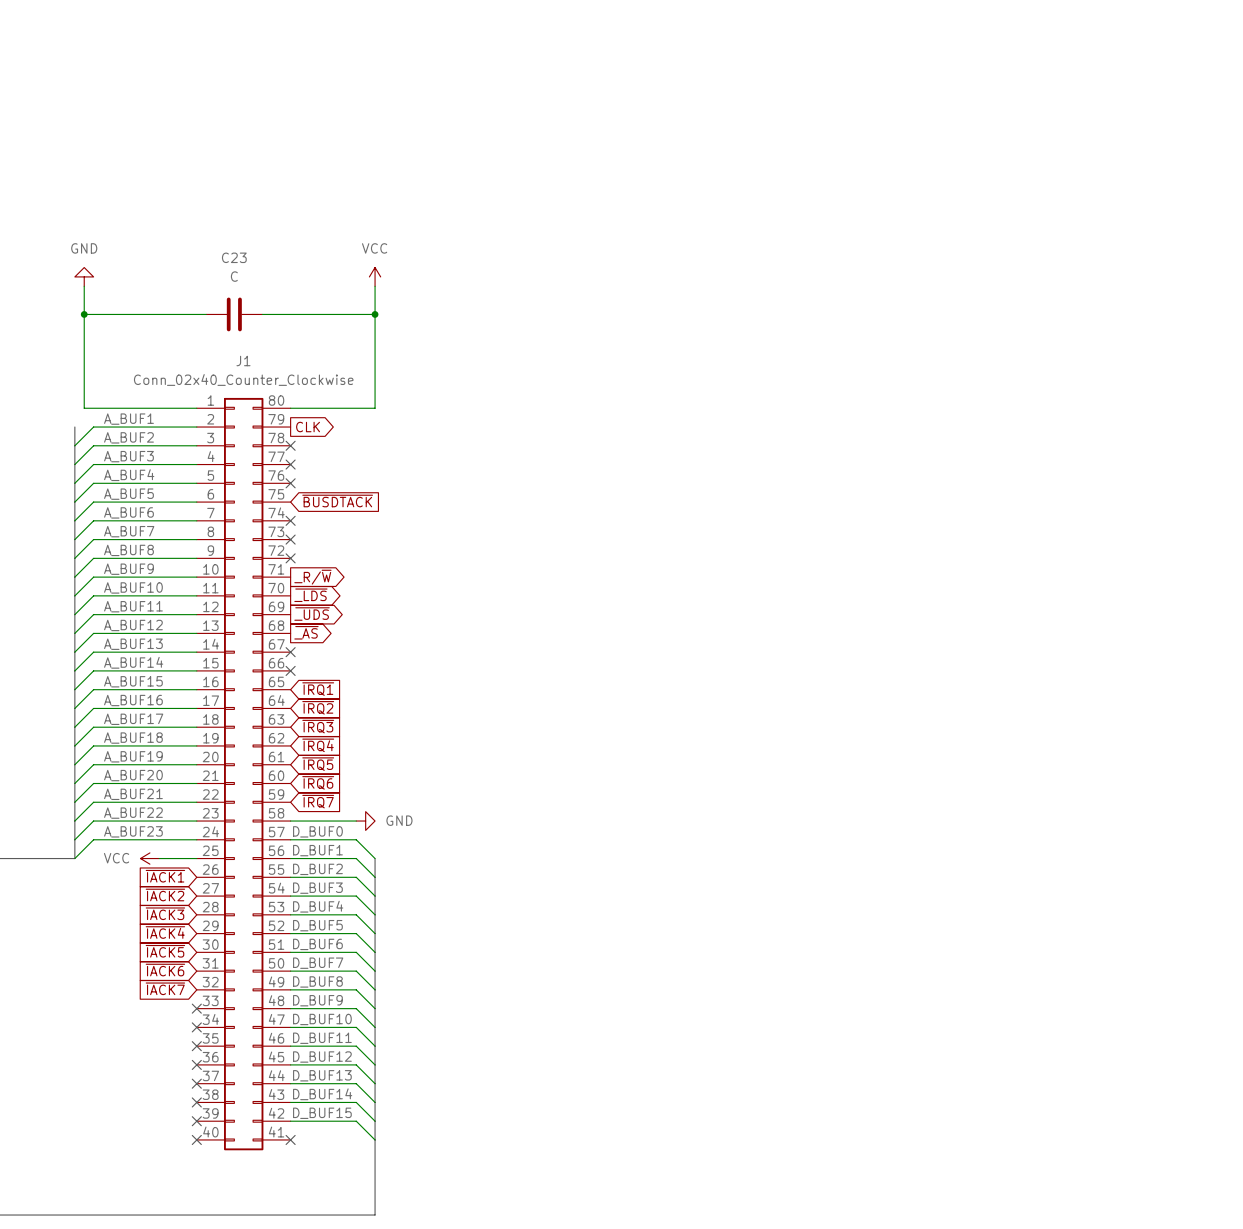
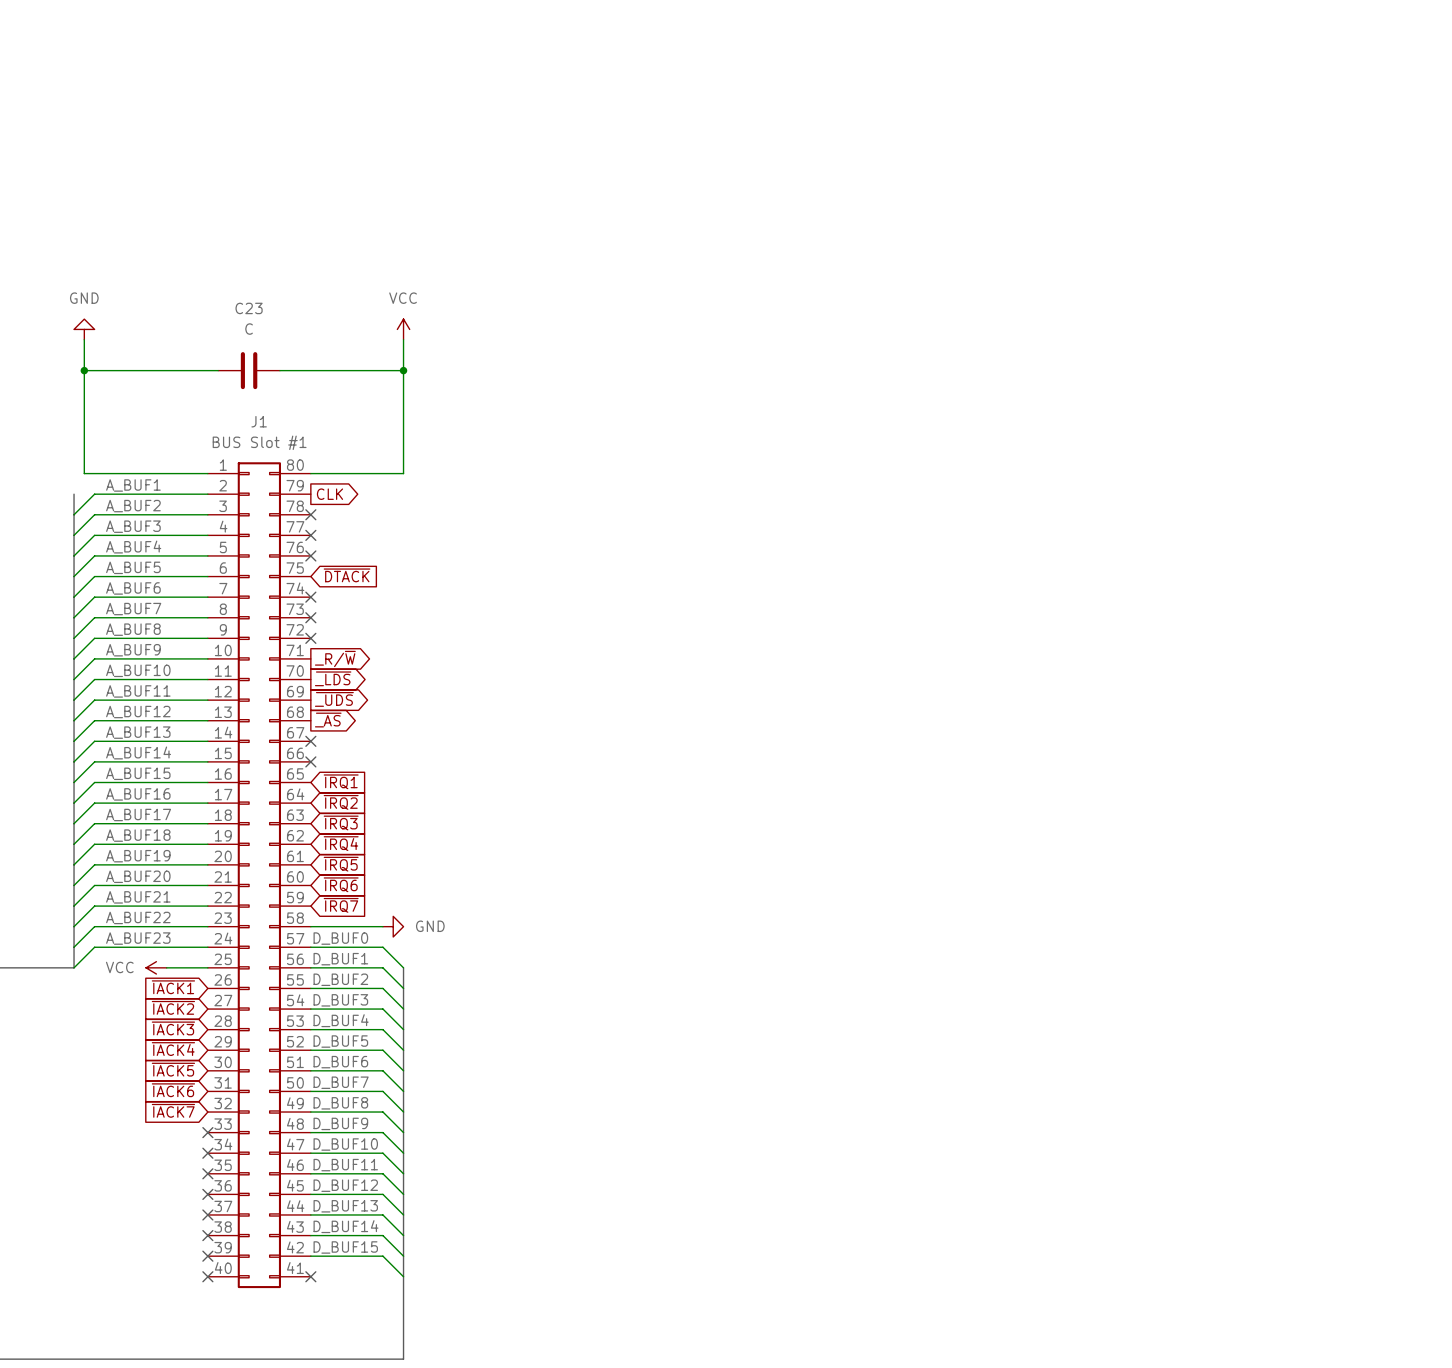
J1 value: Conn_02x40_Counter_Clockwise (243, 379) -> BUS Slot #1 (259, 442)
global label: ~{BUSDTACK} (337, 500) -> ~{DTACK} (347, 575)

